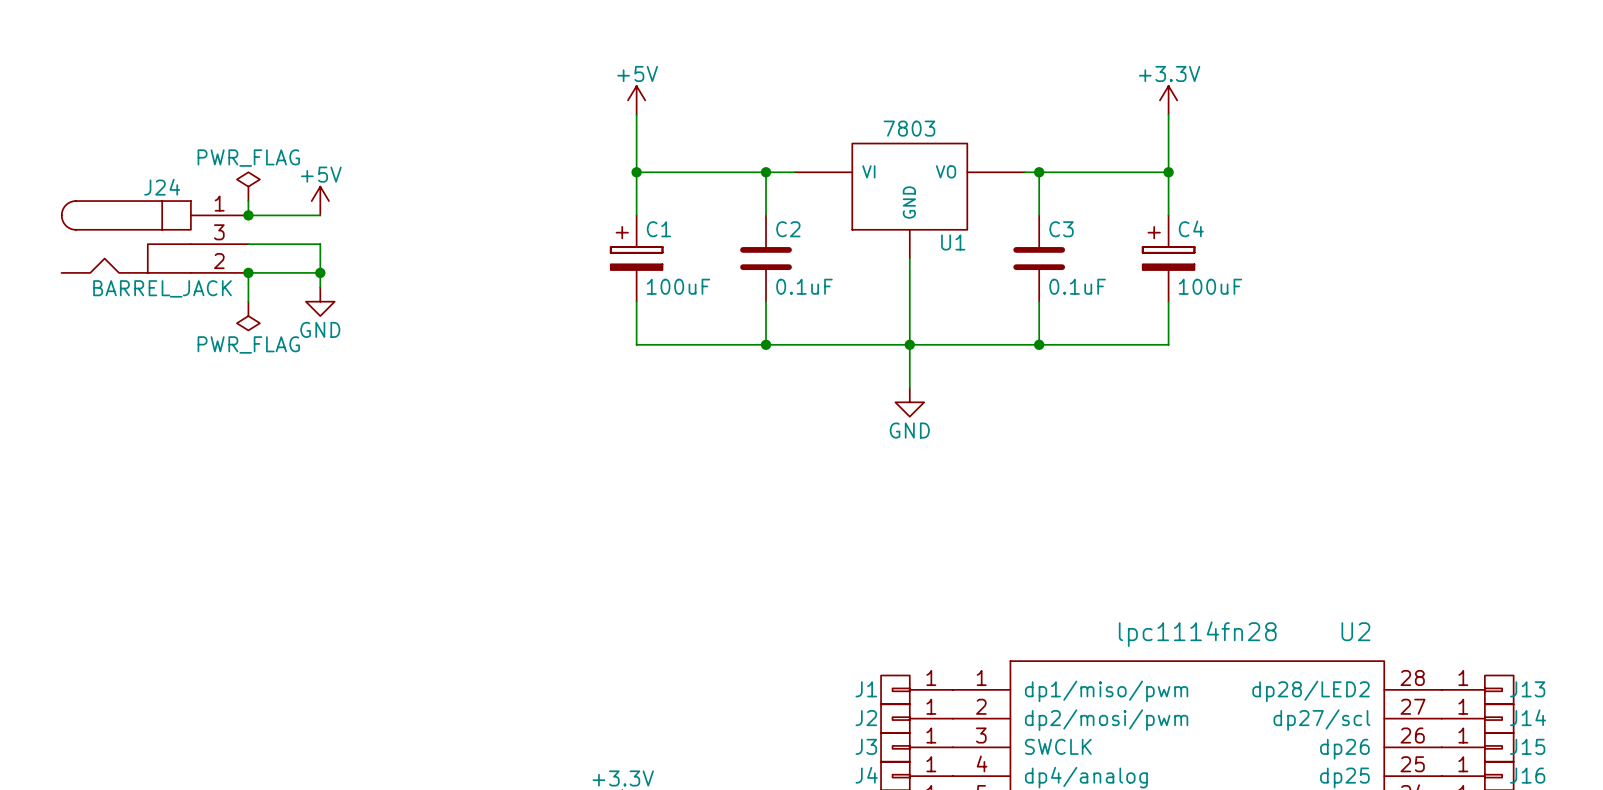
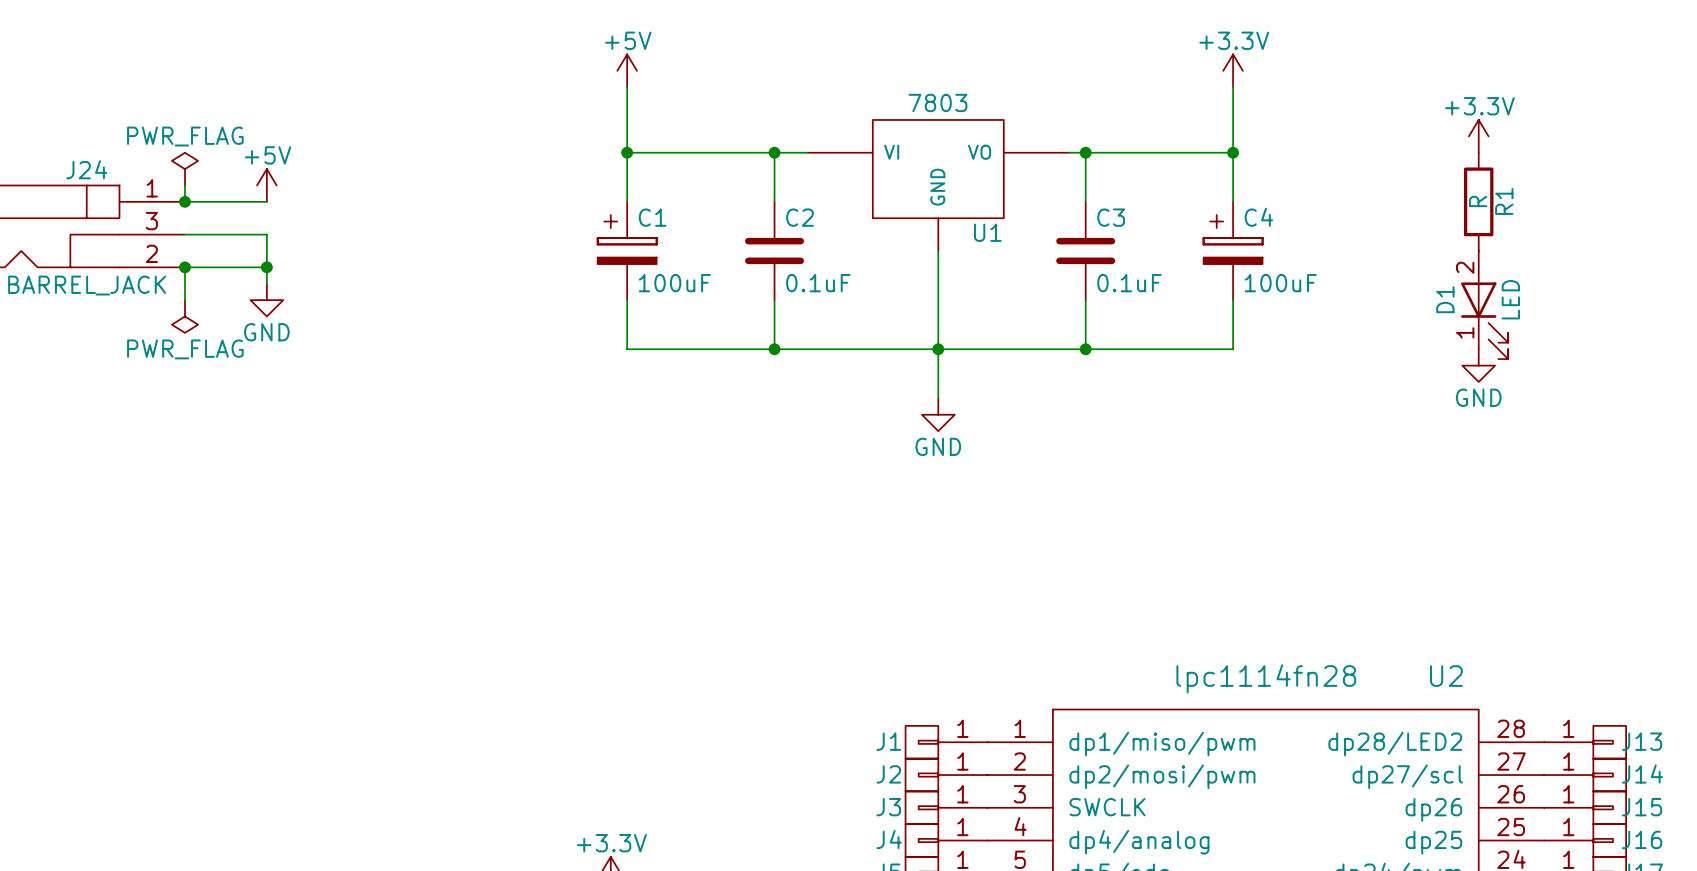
power symbol: none -> +3.3V (1478, 136)
R1: none -> R (1478, 201)
D1: none -> LED (1484, 305)
power symbol: none -> GND (1478, 365)

